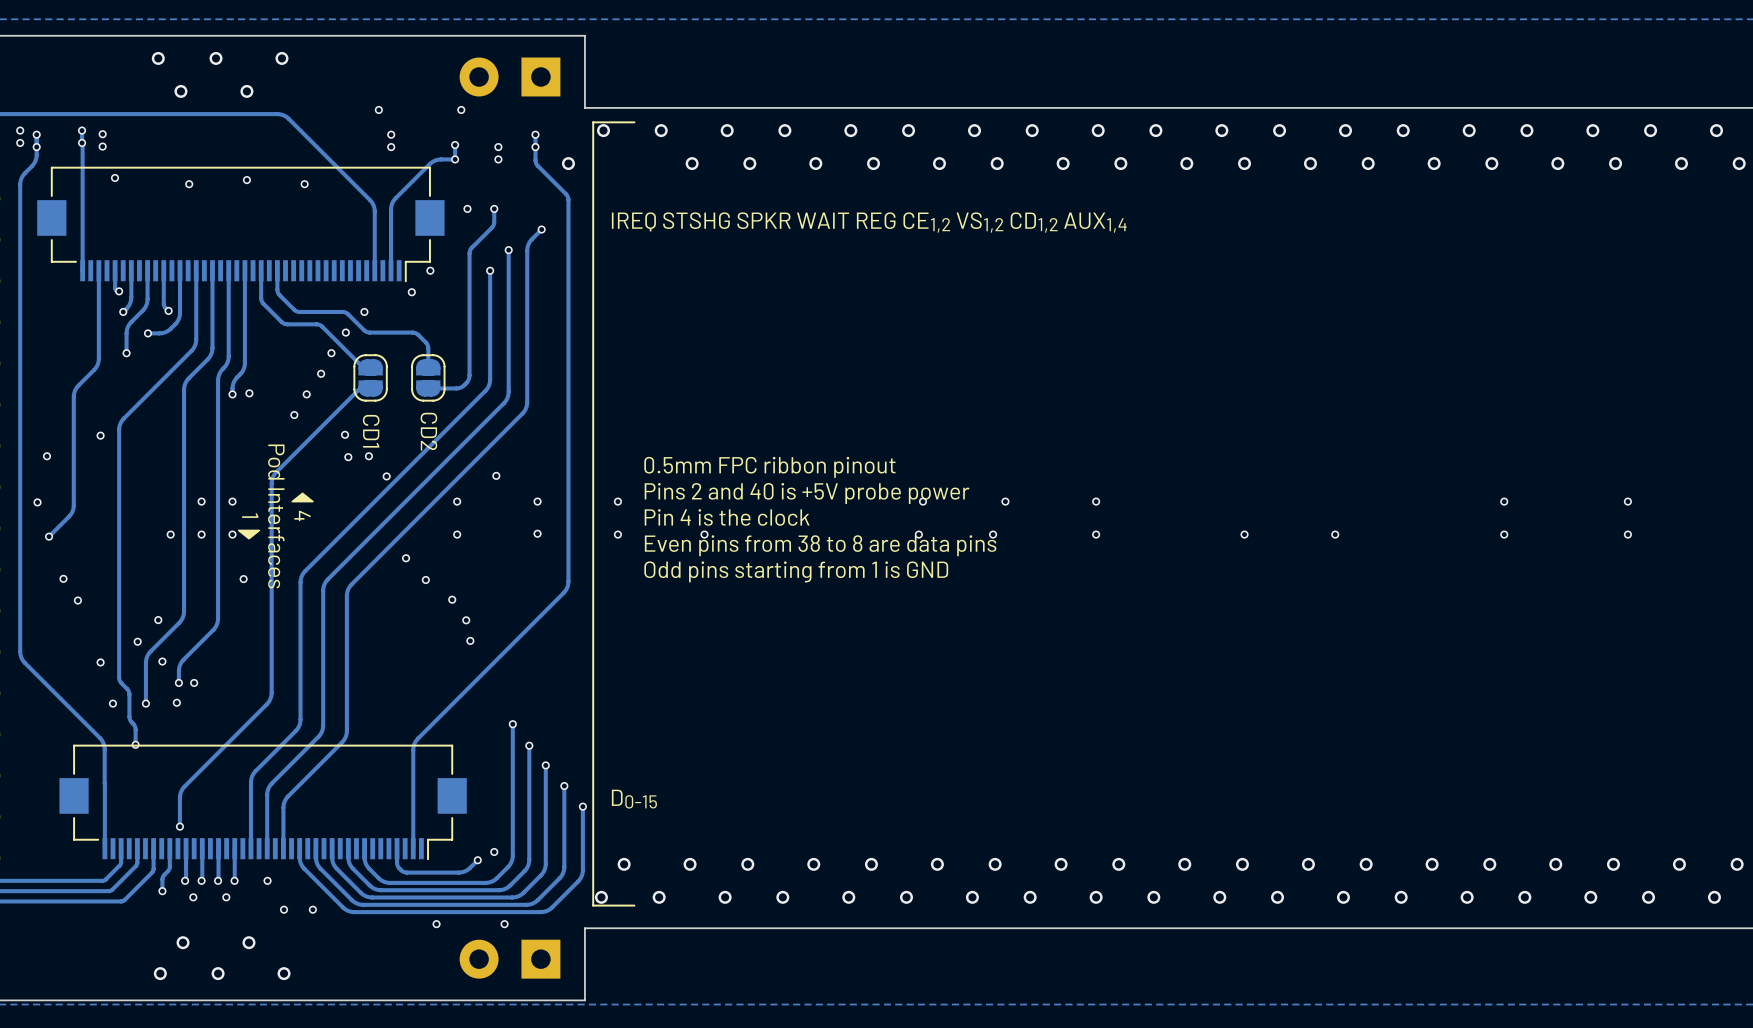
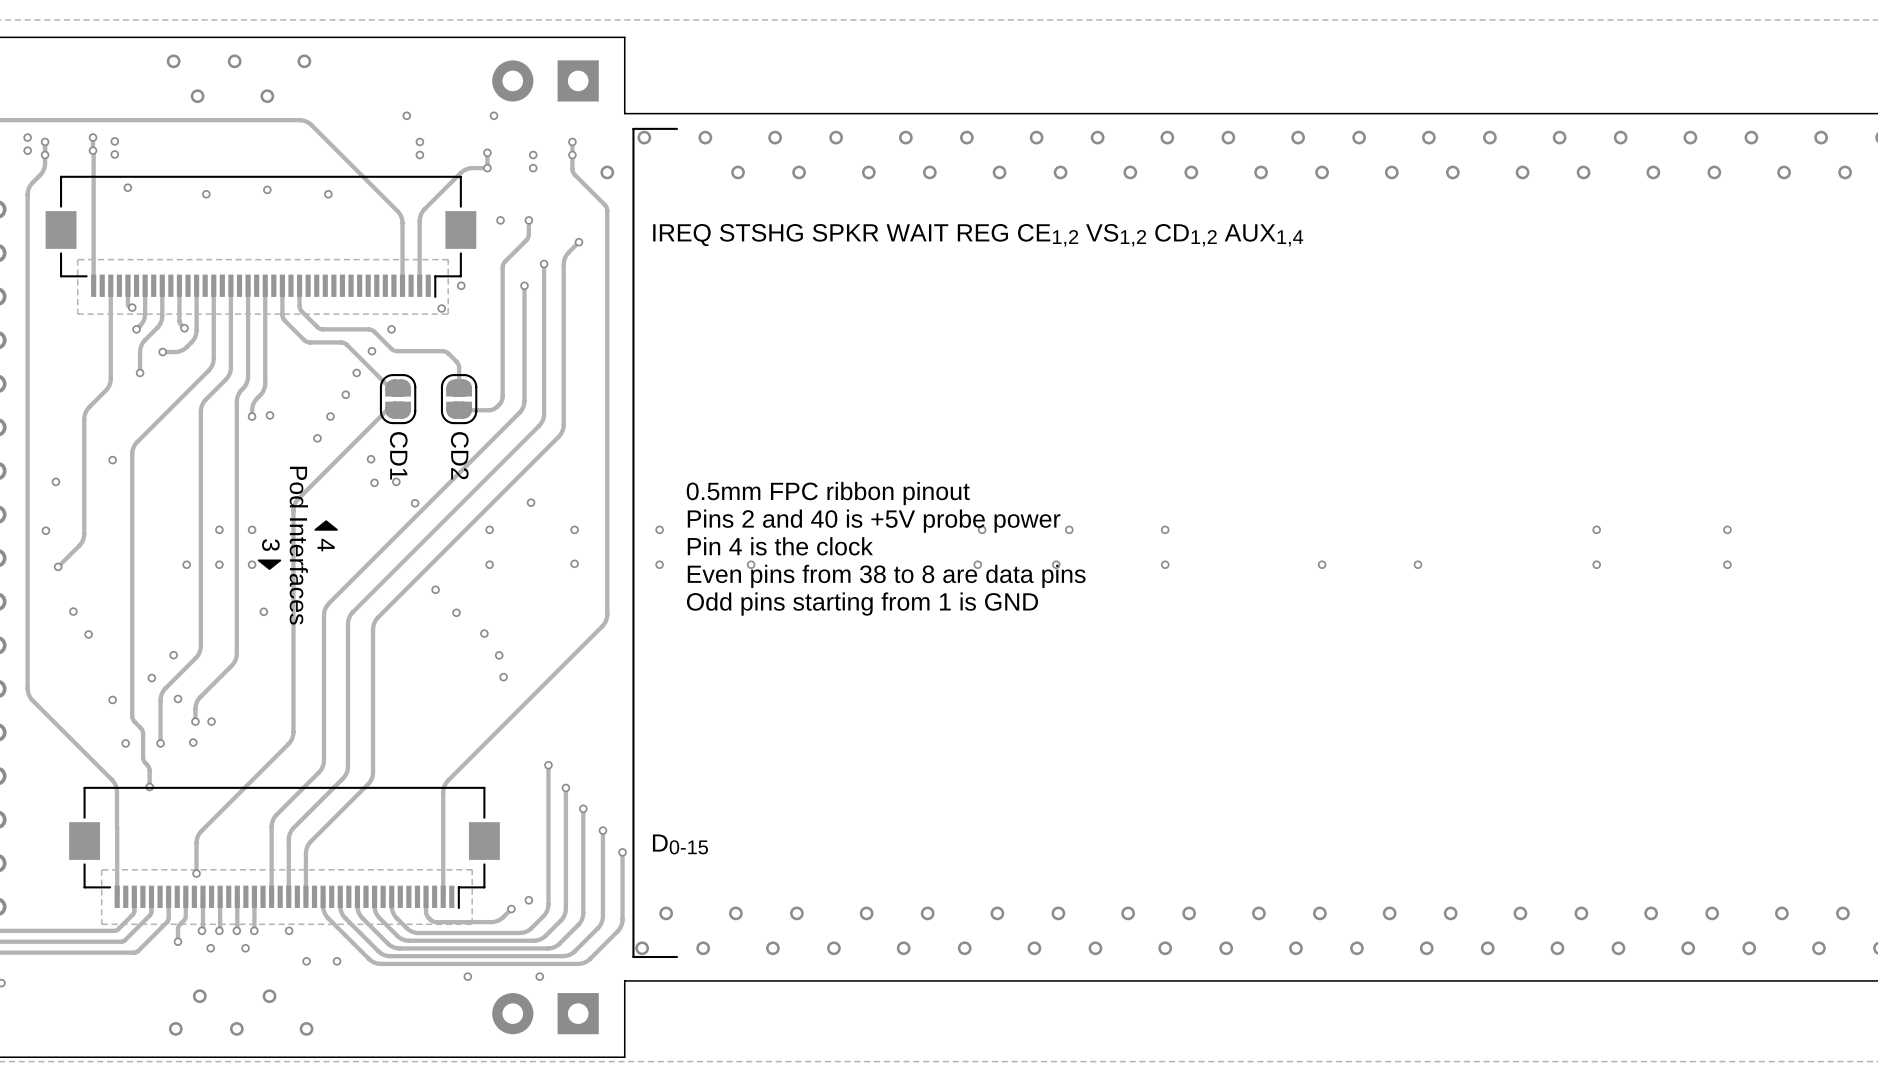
zone outline: none -> (448, 259) (77, 259) (77, 314) (448, 314) (448, 259)
text: 1 (250, 515) -> 3 (270, 545)
zone outline: none -> (472, 869) (101, 869) (101, 924) (472, 924) (472, 869)

